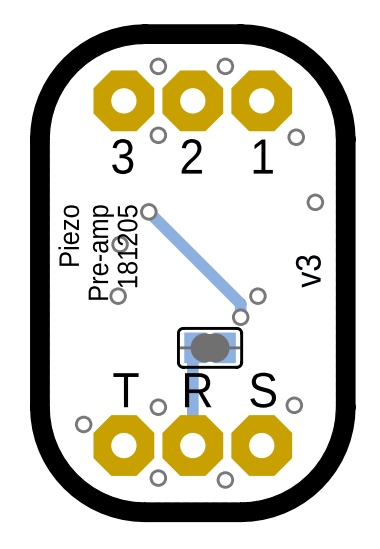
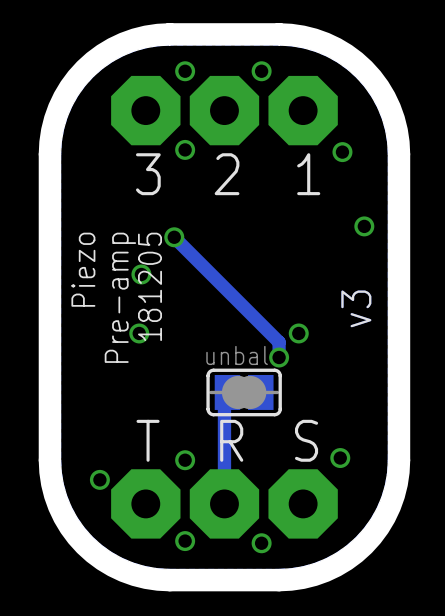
text: none -> unbal (237, 355)

